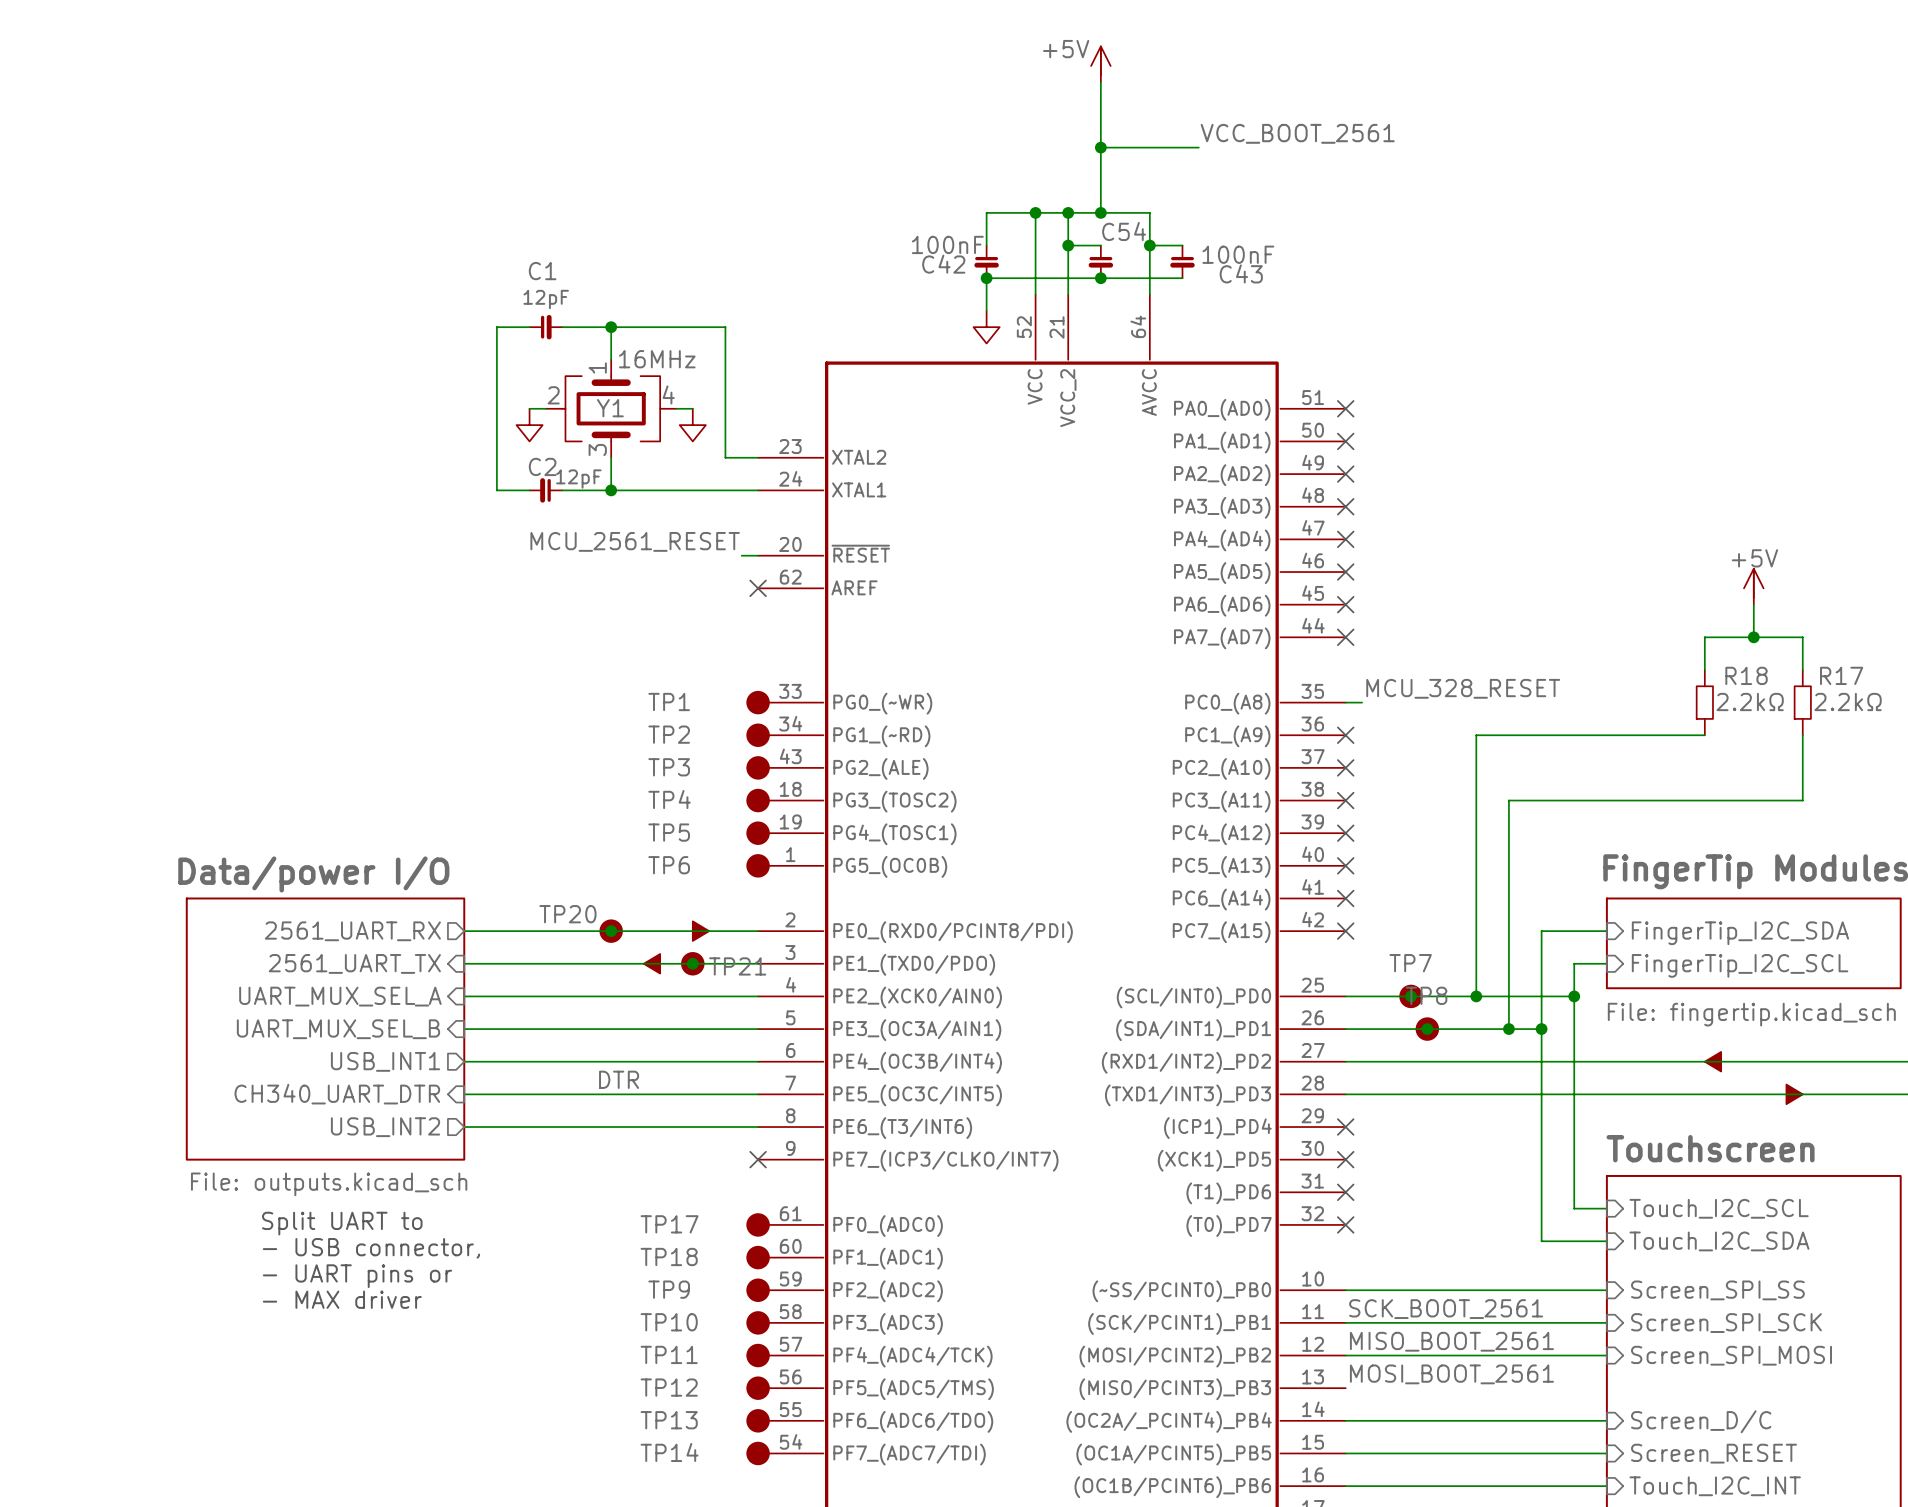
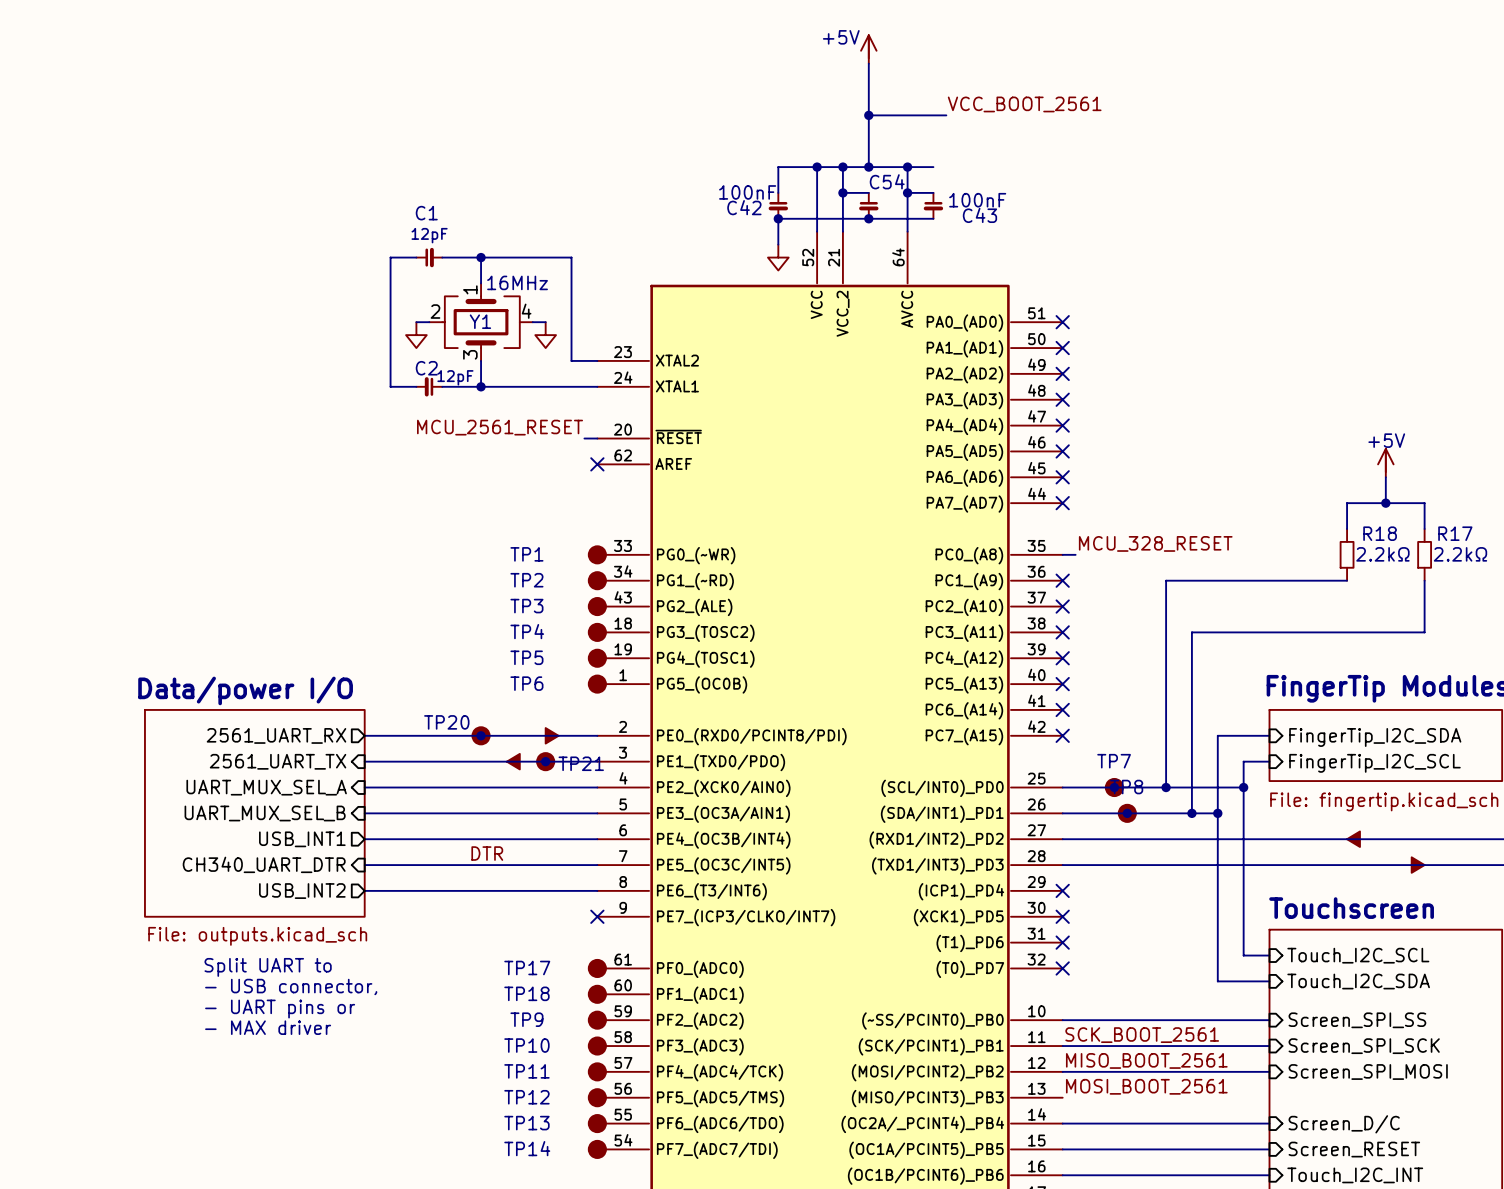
wire: none -> (907, 167) (933, 167)
junction: none -> (907, 167)

